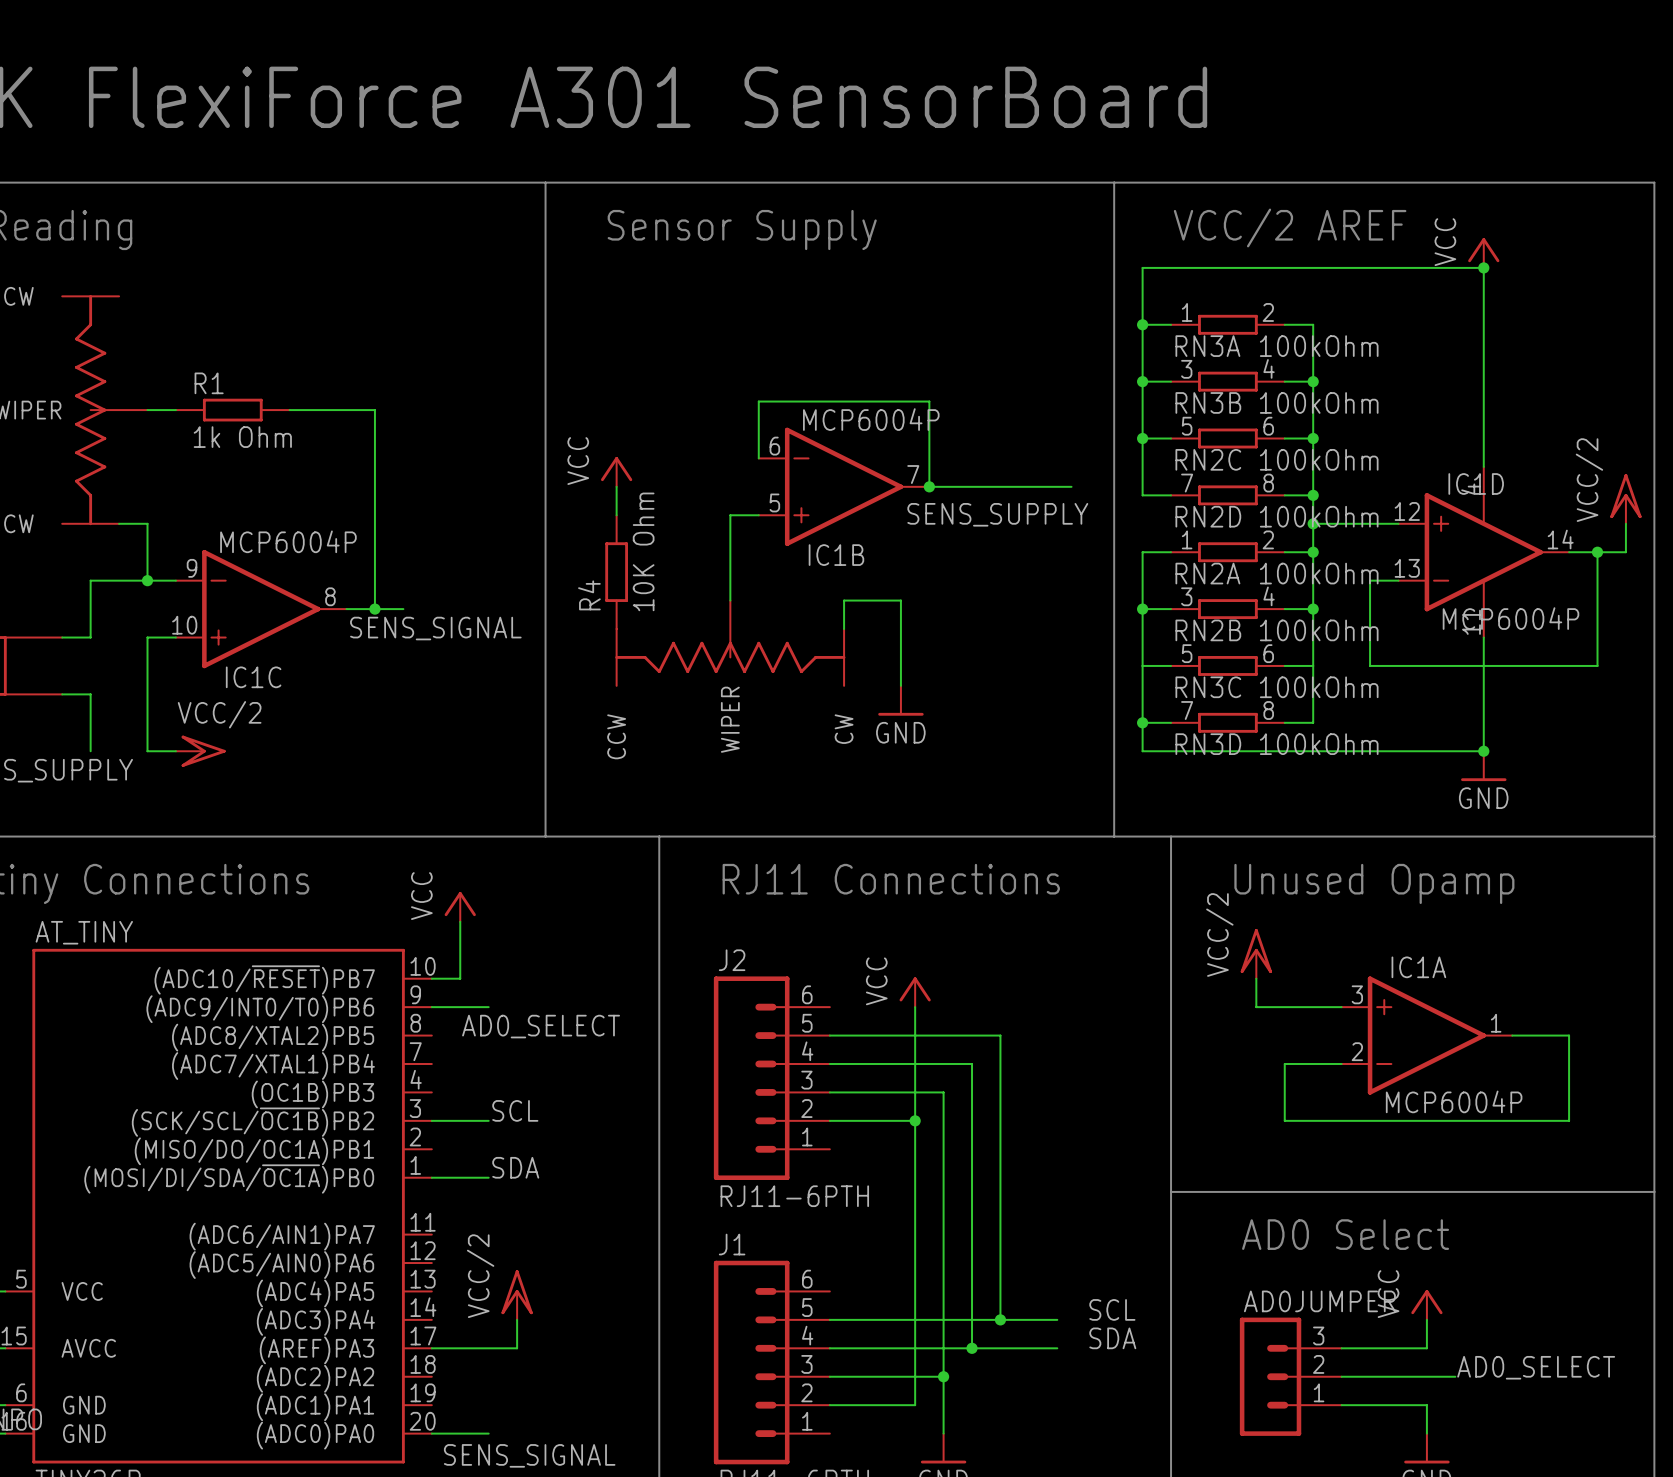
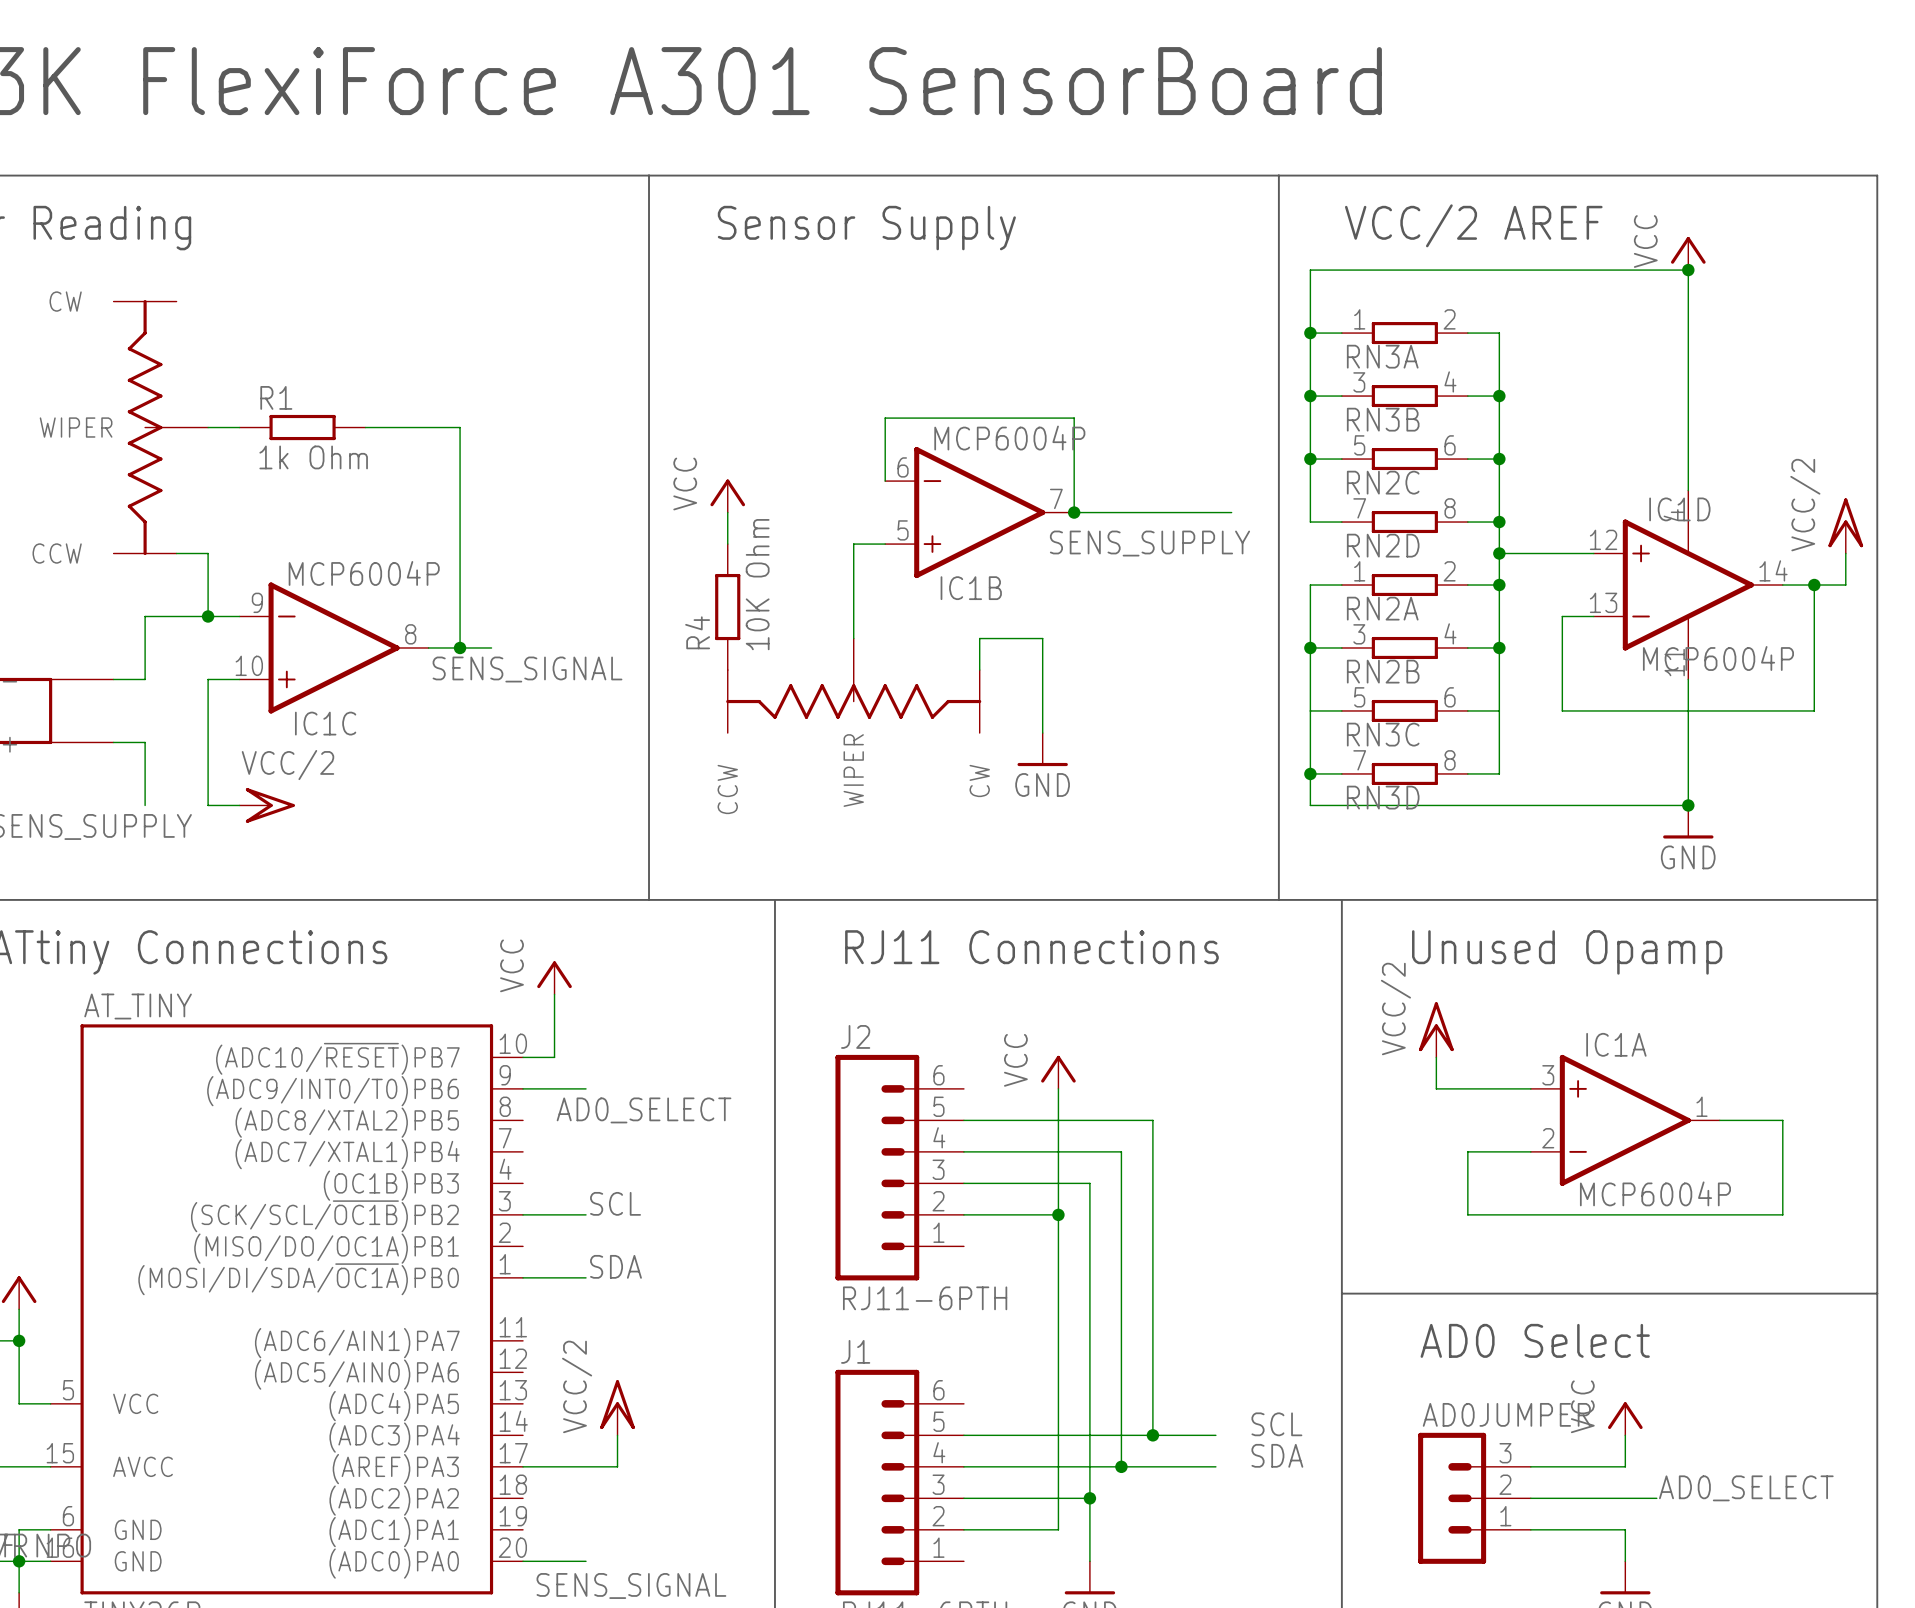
RN3A value: 100kOhm (1319, 346) -> none
RN3B value: 100kOhm (1319, 402) -> none
RN2C value: 100kOhm (1319, 459) -> none
RN2D value: 100kOhm (1319, 516) -> none
RN2A value: 100kOhm (1319, 573) -> none
RN2B value: 100kOhm (1319, 630) -> none
RN3C value: 100kOhm (1319, 687) -> none
RN3D value: 100kOhm (1319, 744) -> none

